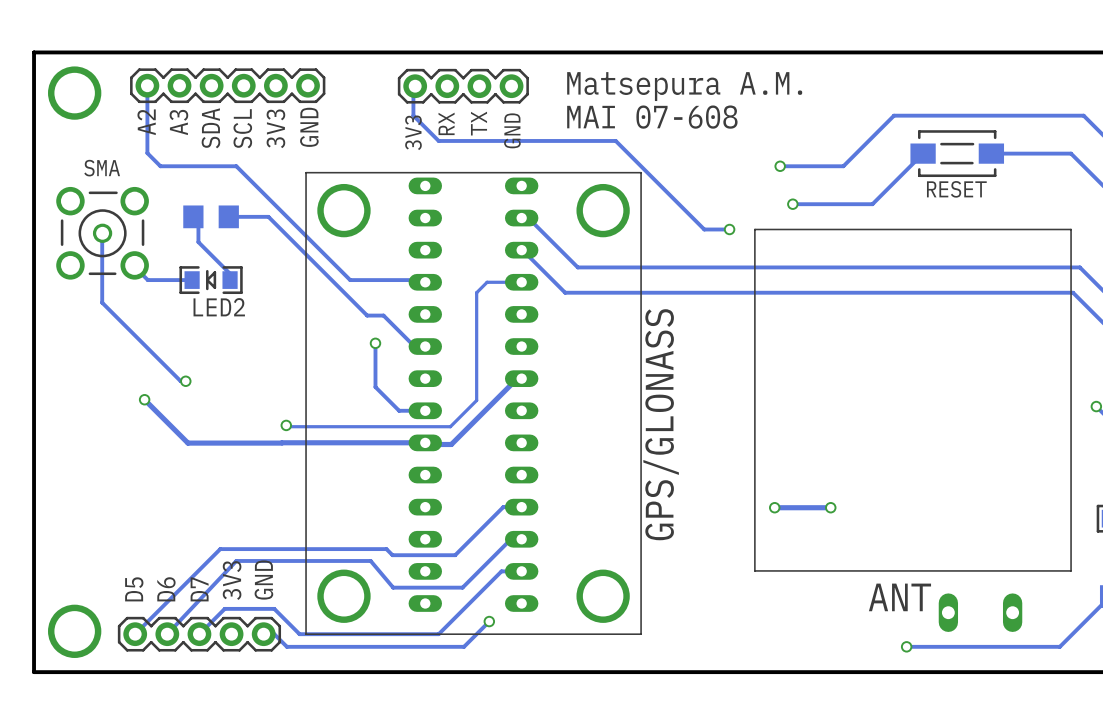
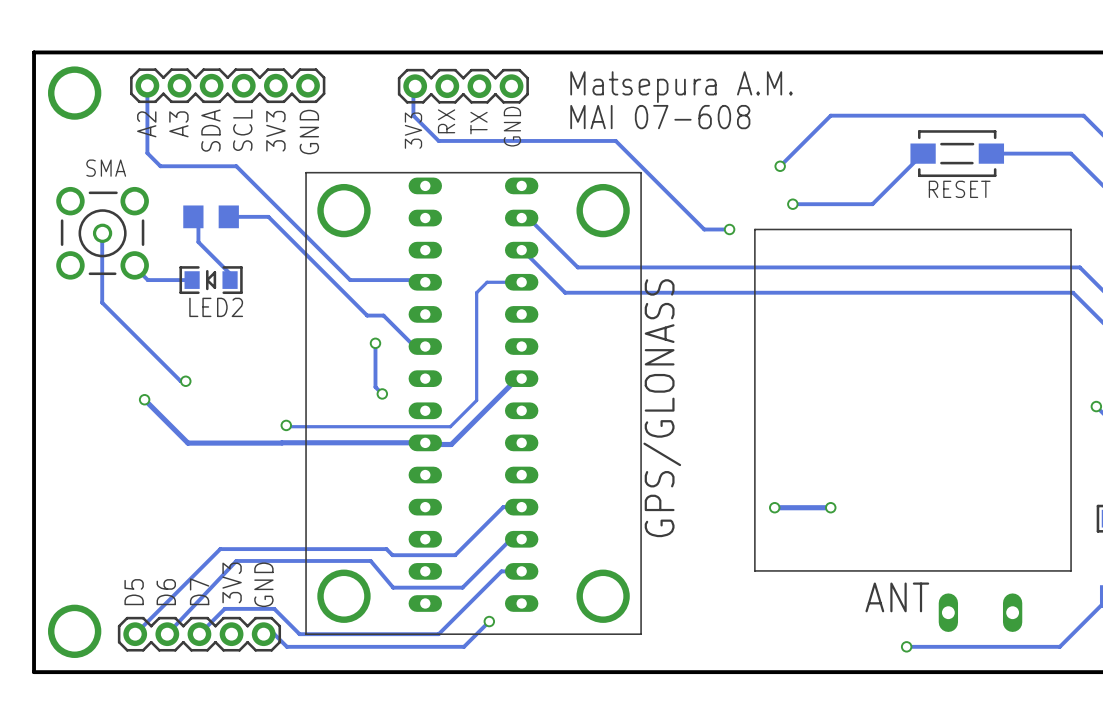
track: (894, 115) (843, 166) (780, 166) -> (894, 115) (830, 115) (780, 166)
track: (382, 393) (399, 410) (425, 410) -> none
via: none -> (382, 393)

